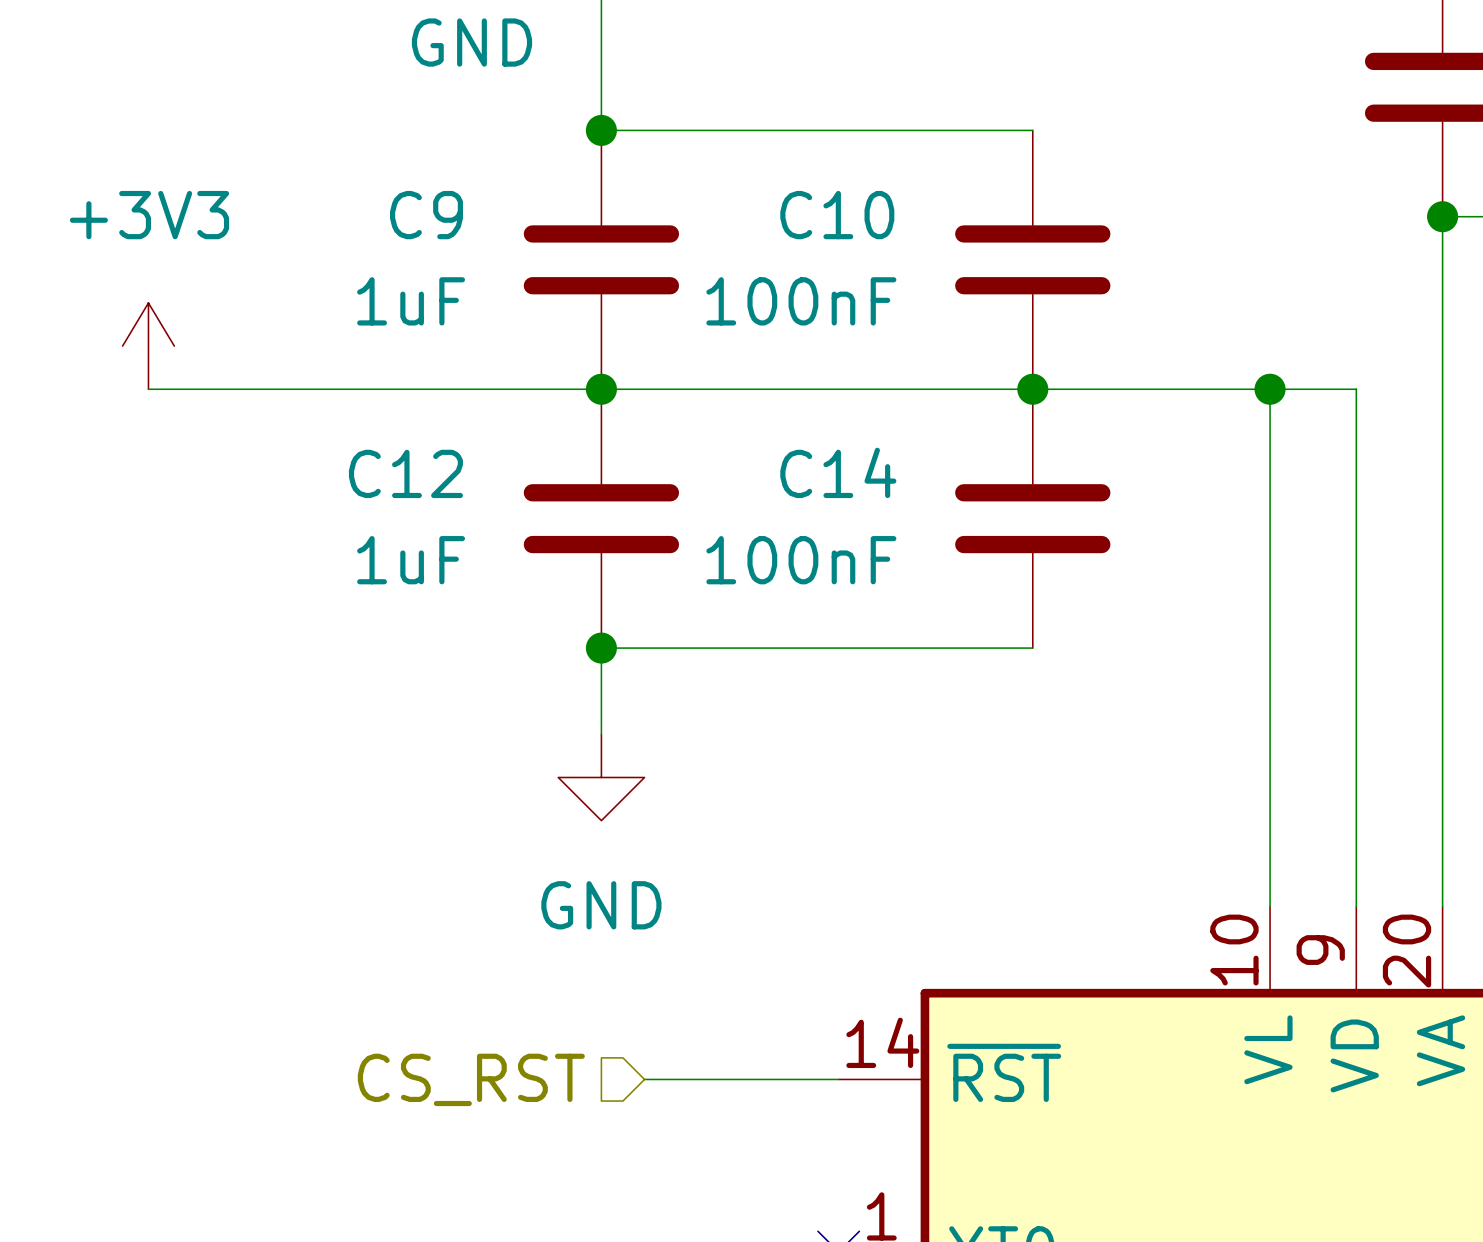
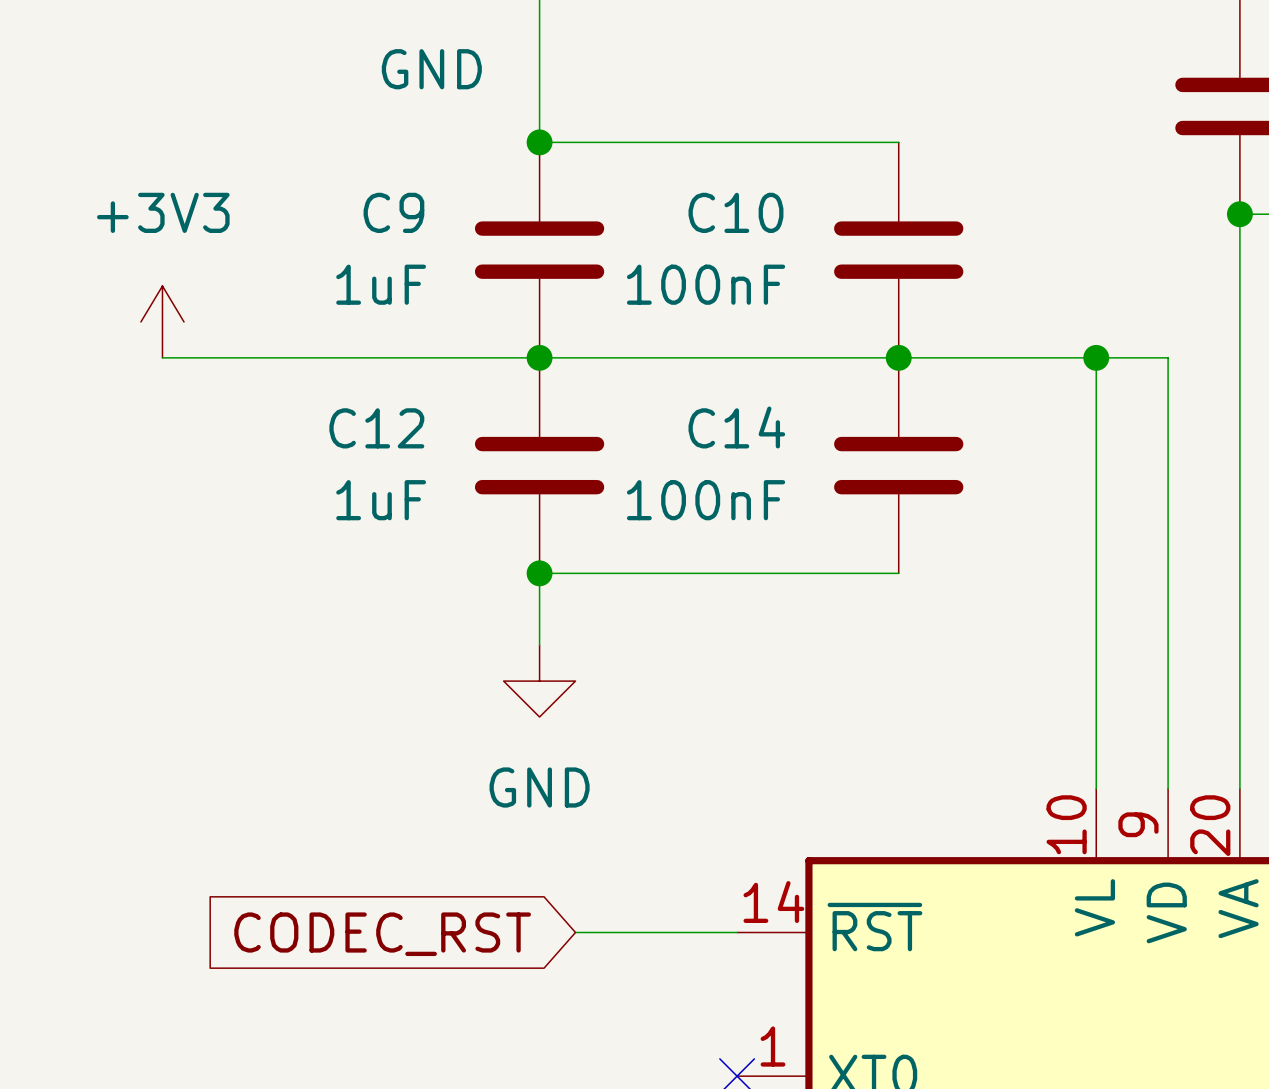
hierarchical label: CS_RST (471, 1079) -> none
global label: none -> CODEC_RST (382, 934)

